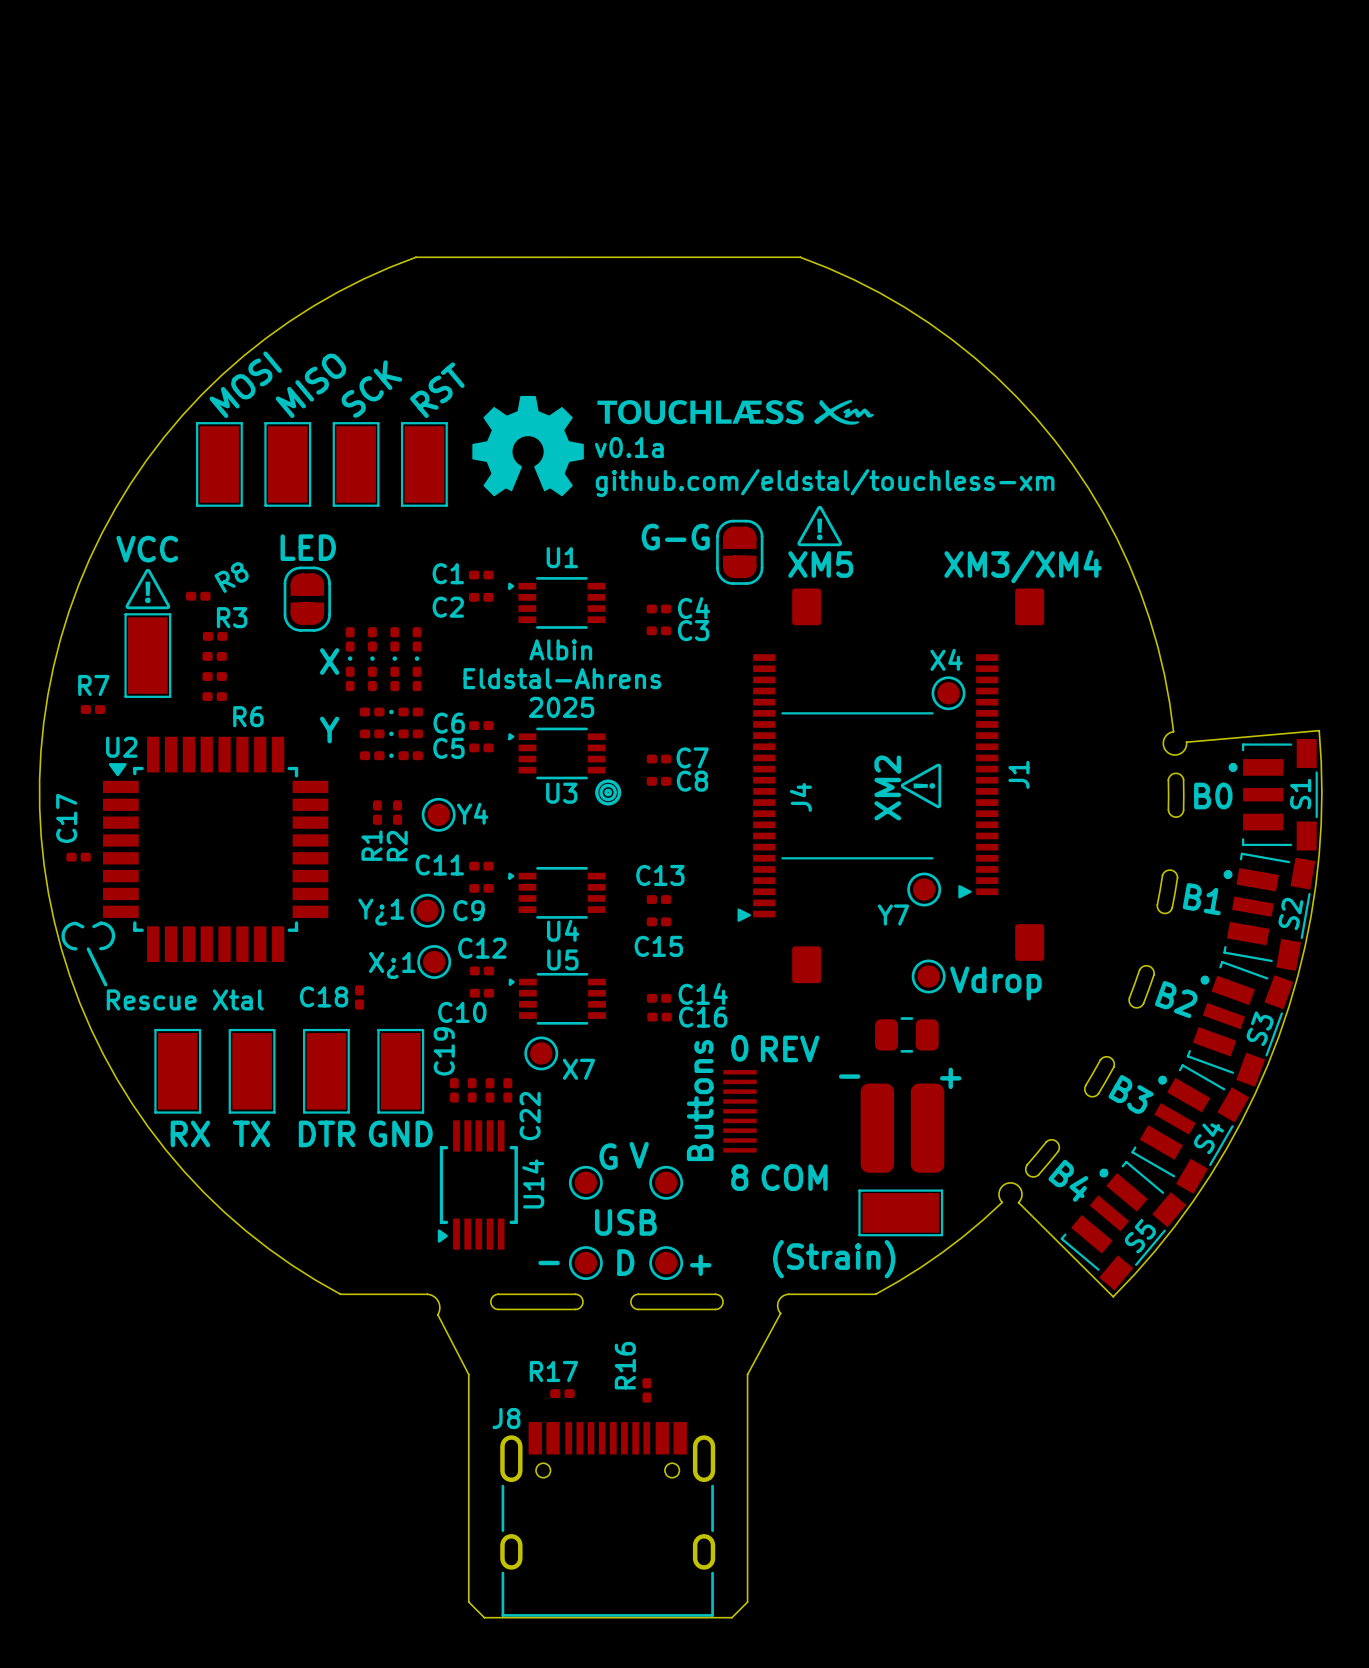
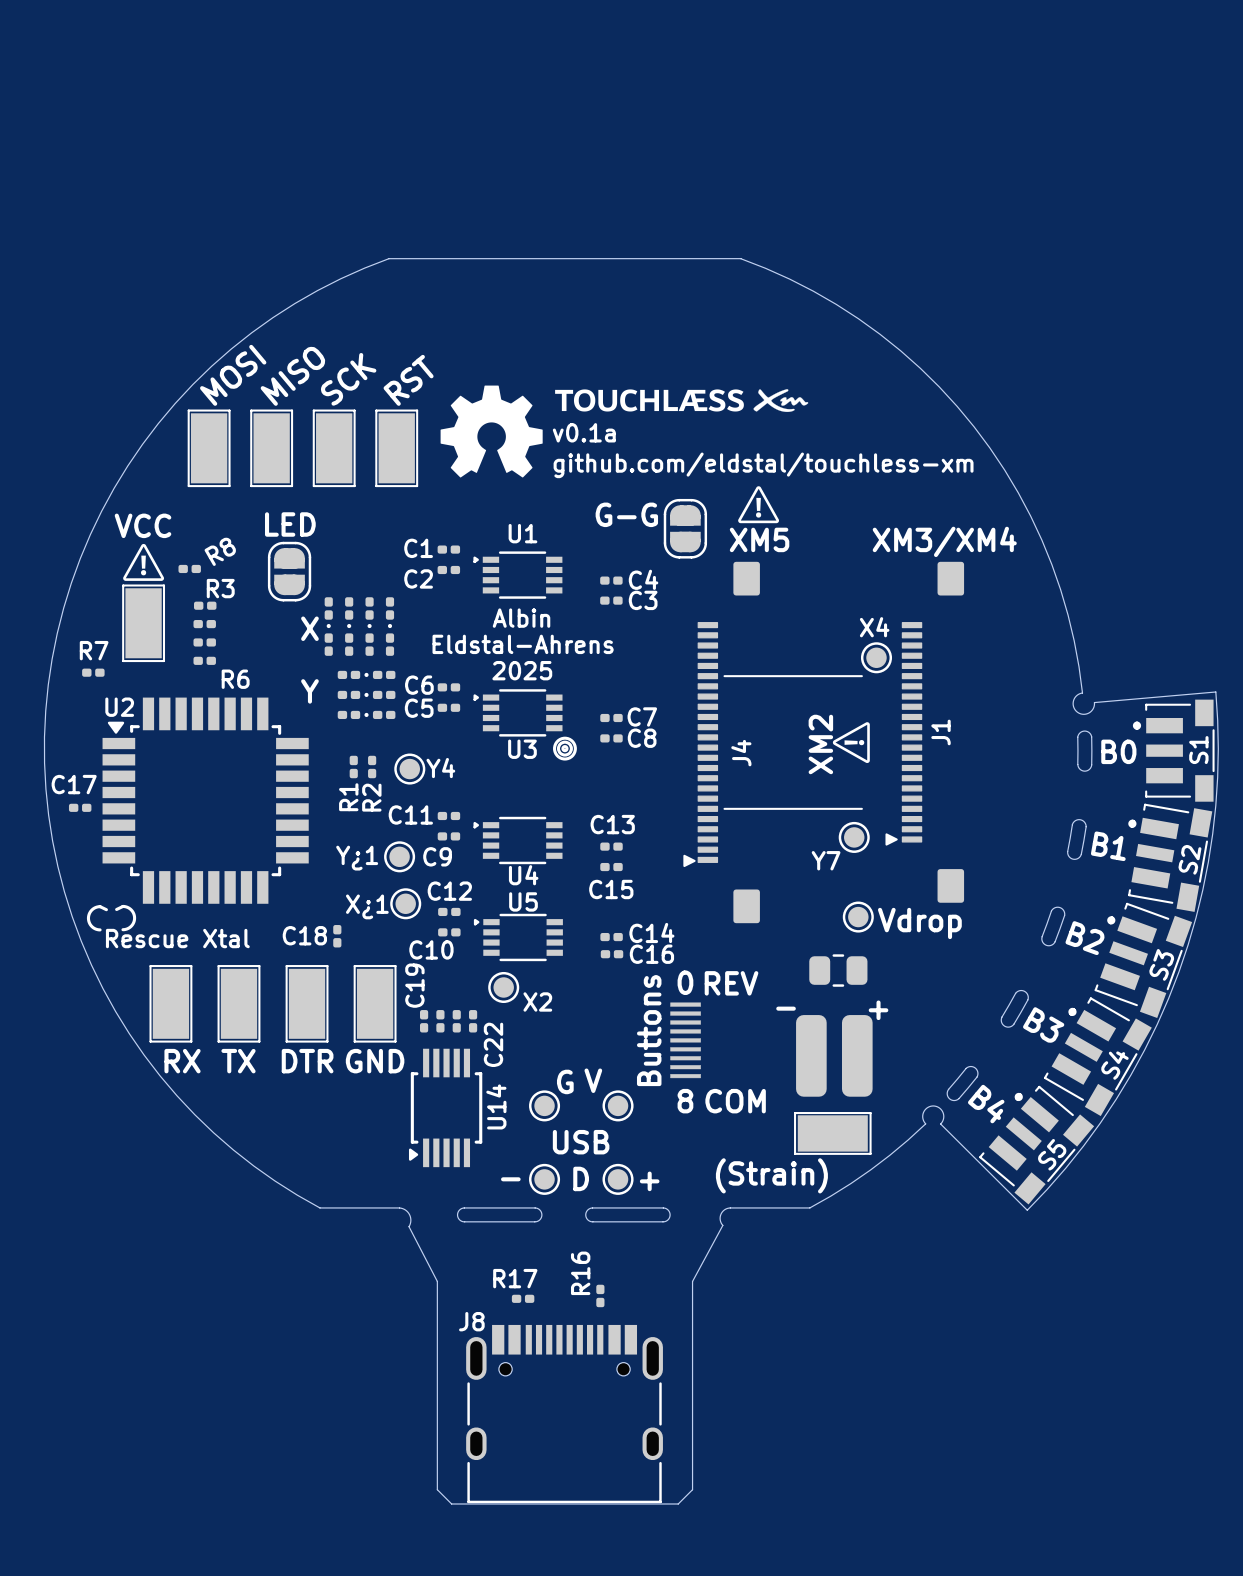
C17 name rotation: 0° (66, 818) -> 90° clockwise (74, 784)
line: (82, 926) (72, 923) (63, 931) (65, 943) (75, 948) -> (106, 909) (97, 906) (89, 914) (90, 924) (100, 929)
line: (93, 926) (104, 923) (109, 926) (113, 932) (110, 943) (100, 948) -> none
line: (88, 949) (105, 984) -> none
line: none -> (116, 909) (125, 906) (133, 913) (132, 924) (122, 929)
X7 name: X7 (578, 1069) -> X2 (537, 1001)

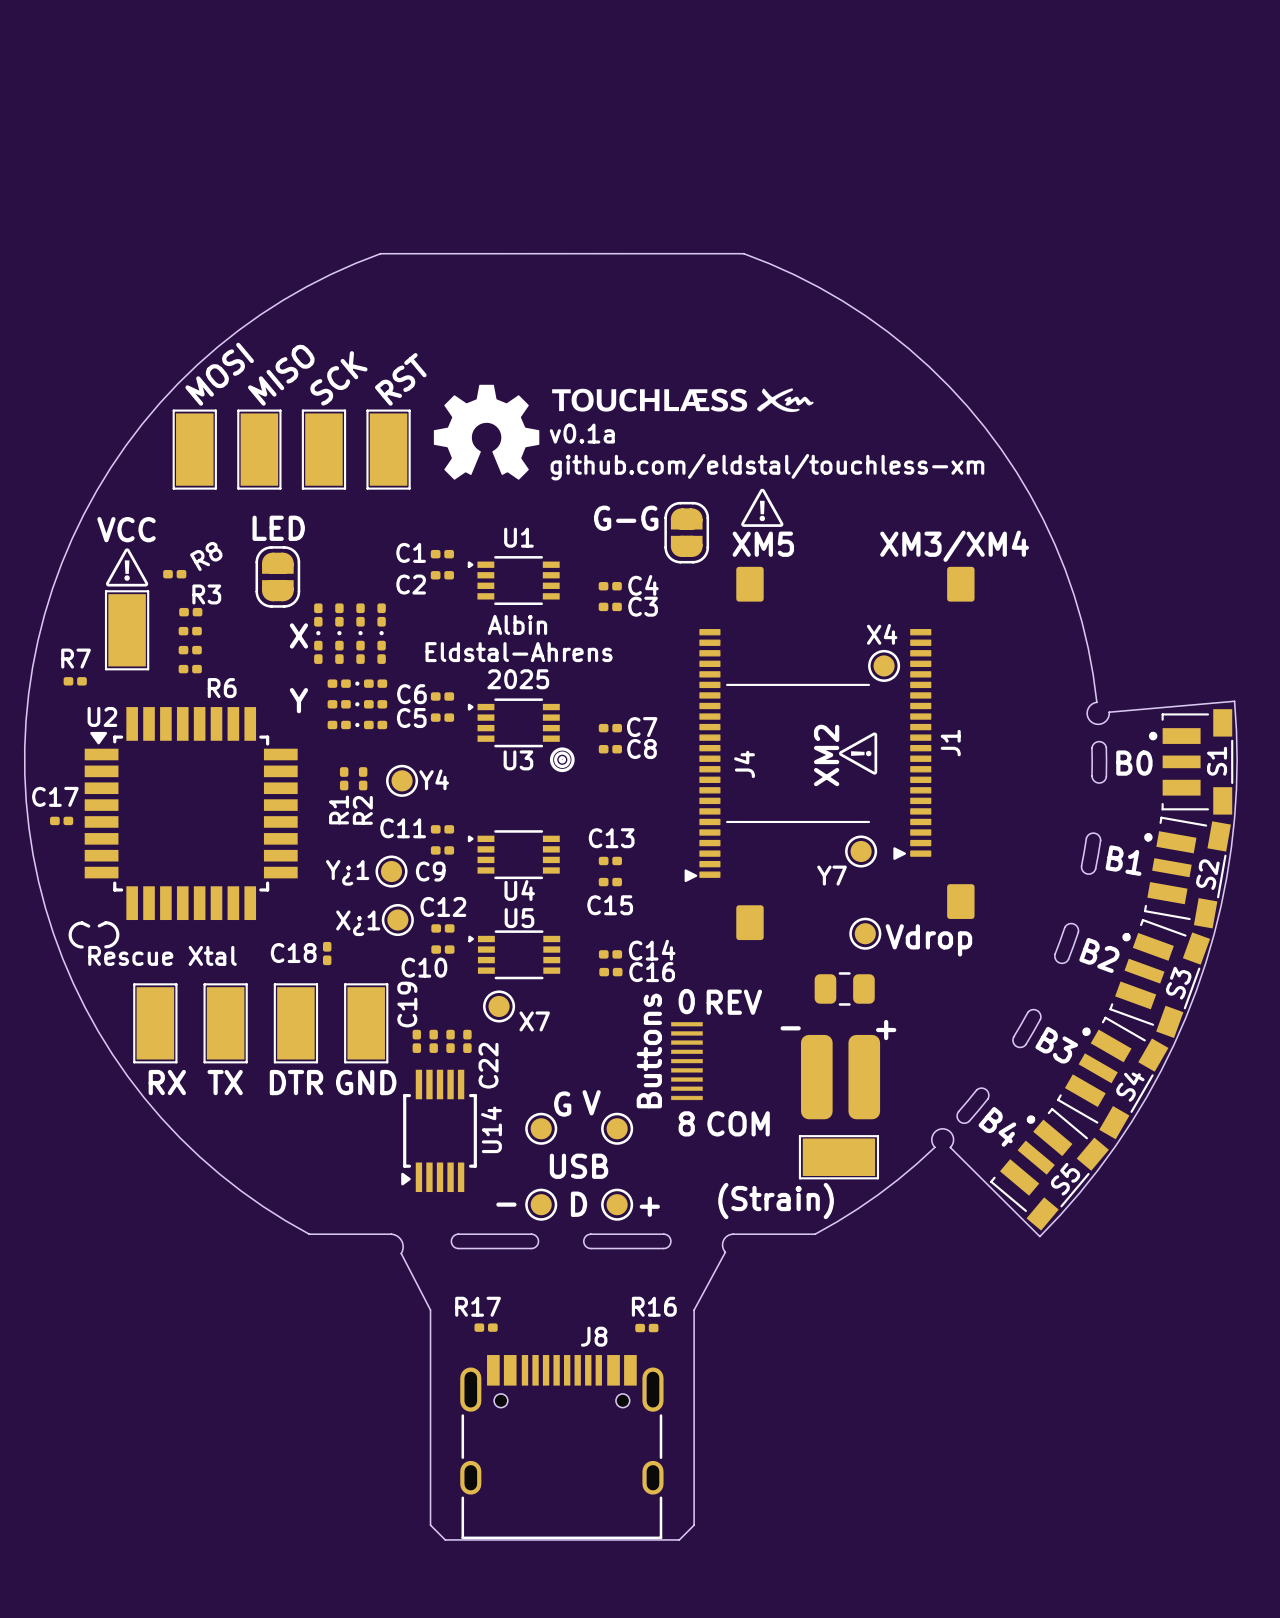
X2 name: X2 (537, 1001) -> X7 (534, 1021)
R16 rotation: 0° (600, 1295) -> 90° clockwise (646, 1328)
R16 position: (600, 1295) -> (646, 1328)
R17 position: (523, 1298) -> (486, 1327)
J8 name position: J8 (471, 1321) -> J8 (594, 1336)

